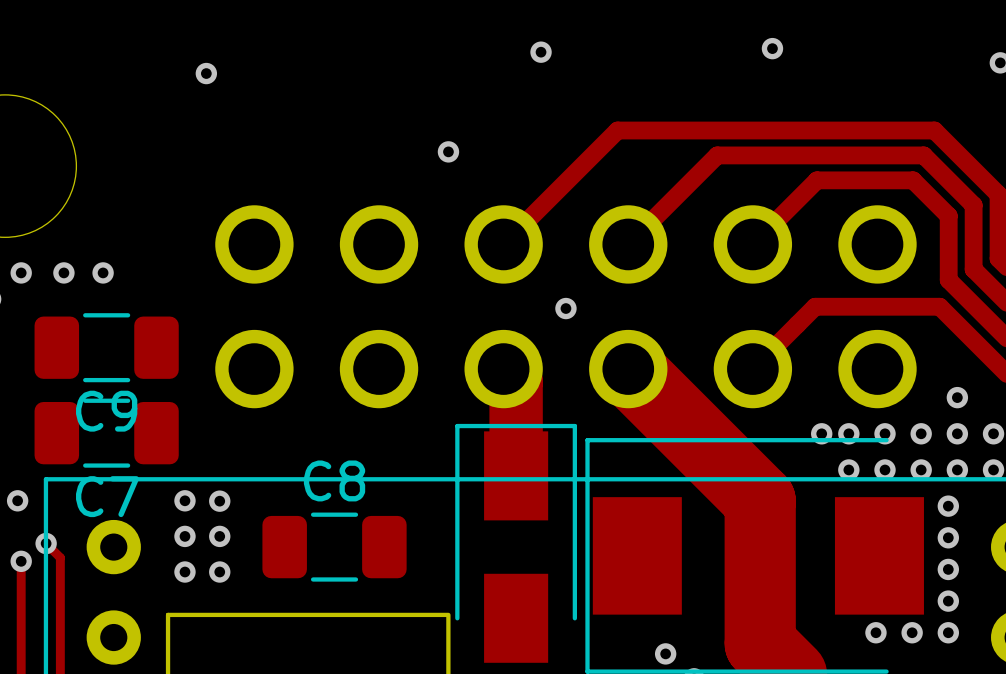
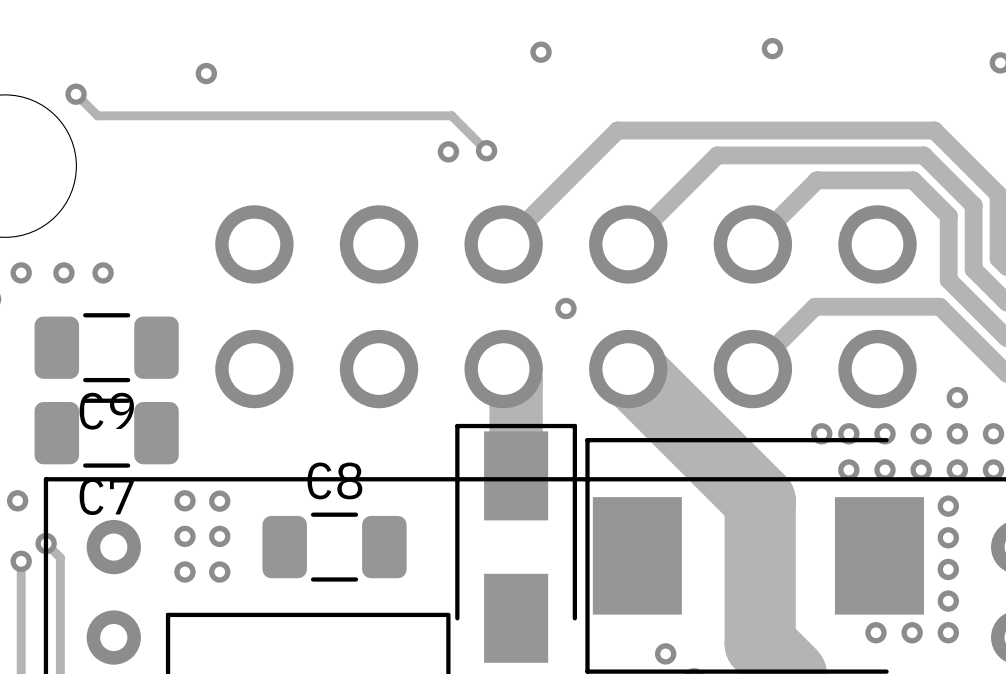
track: none -> (76, 94) (97, 115) (451, 115) (486, 150)
via: none -> (76, 94)
via: none -> (486, 150)

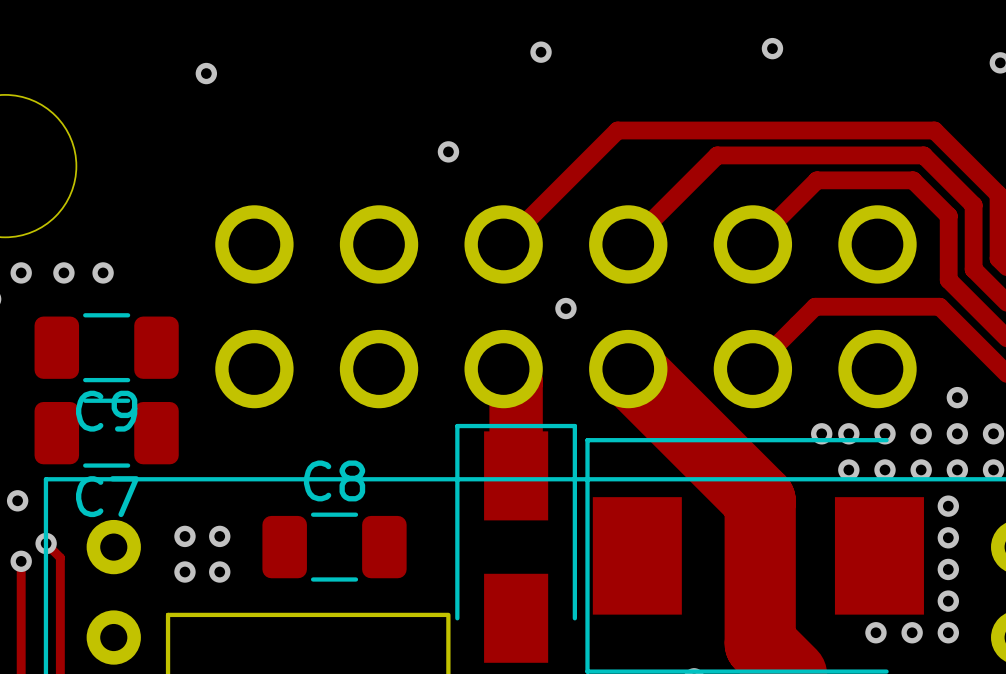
track: (76, 94) (97, 115) (451, 115) (486, 150) -> none
via: (76, 94) -> none
via: (486, 150) -> none
via: (184, 500) -> none
via: (219, 501) -> none
via: (665, 653) -> none

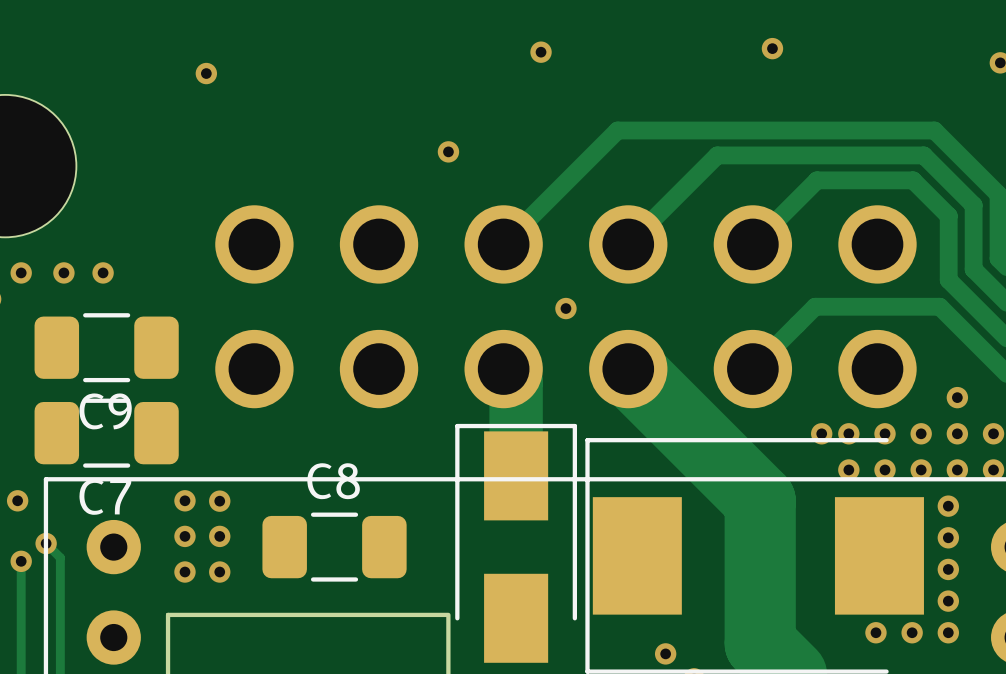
via: none -> (184, 500)
via: none -> (219, 501)
via: none -> (665, 653)

